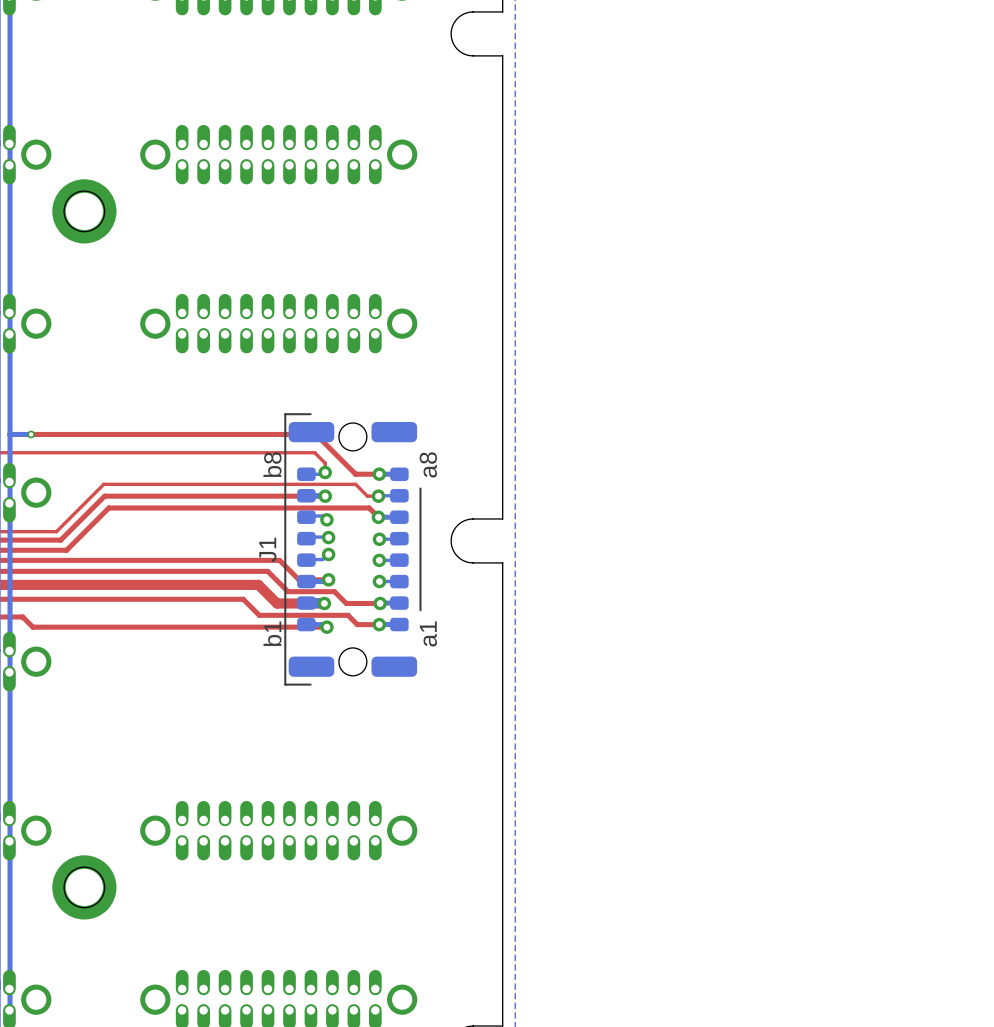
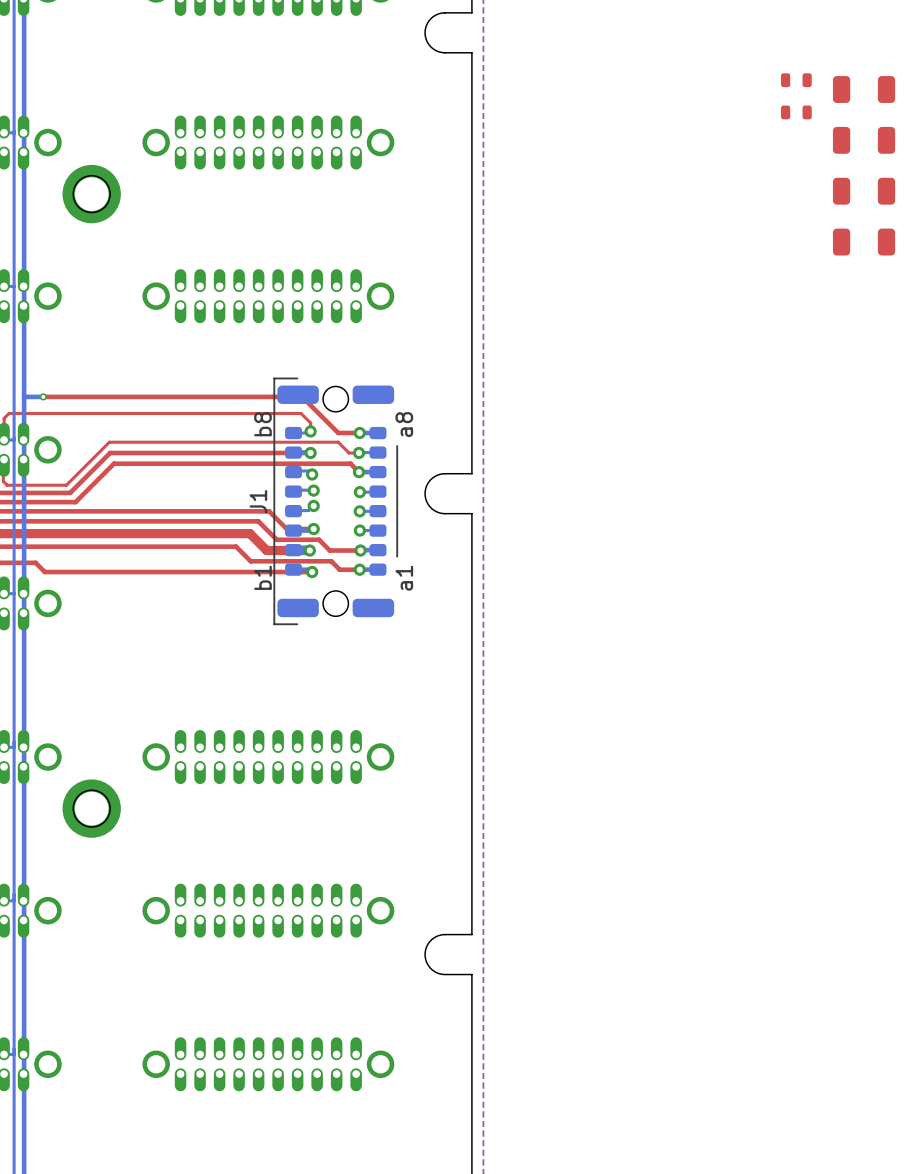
part: none -> (796, 80)
part: none -> (864, 89)
part: none -> (796, 112)
part: none -> (864, 140)
part: none -> (864, 191)
part: none -> (864, 242)

